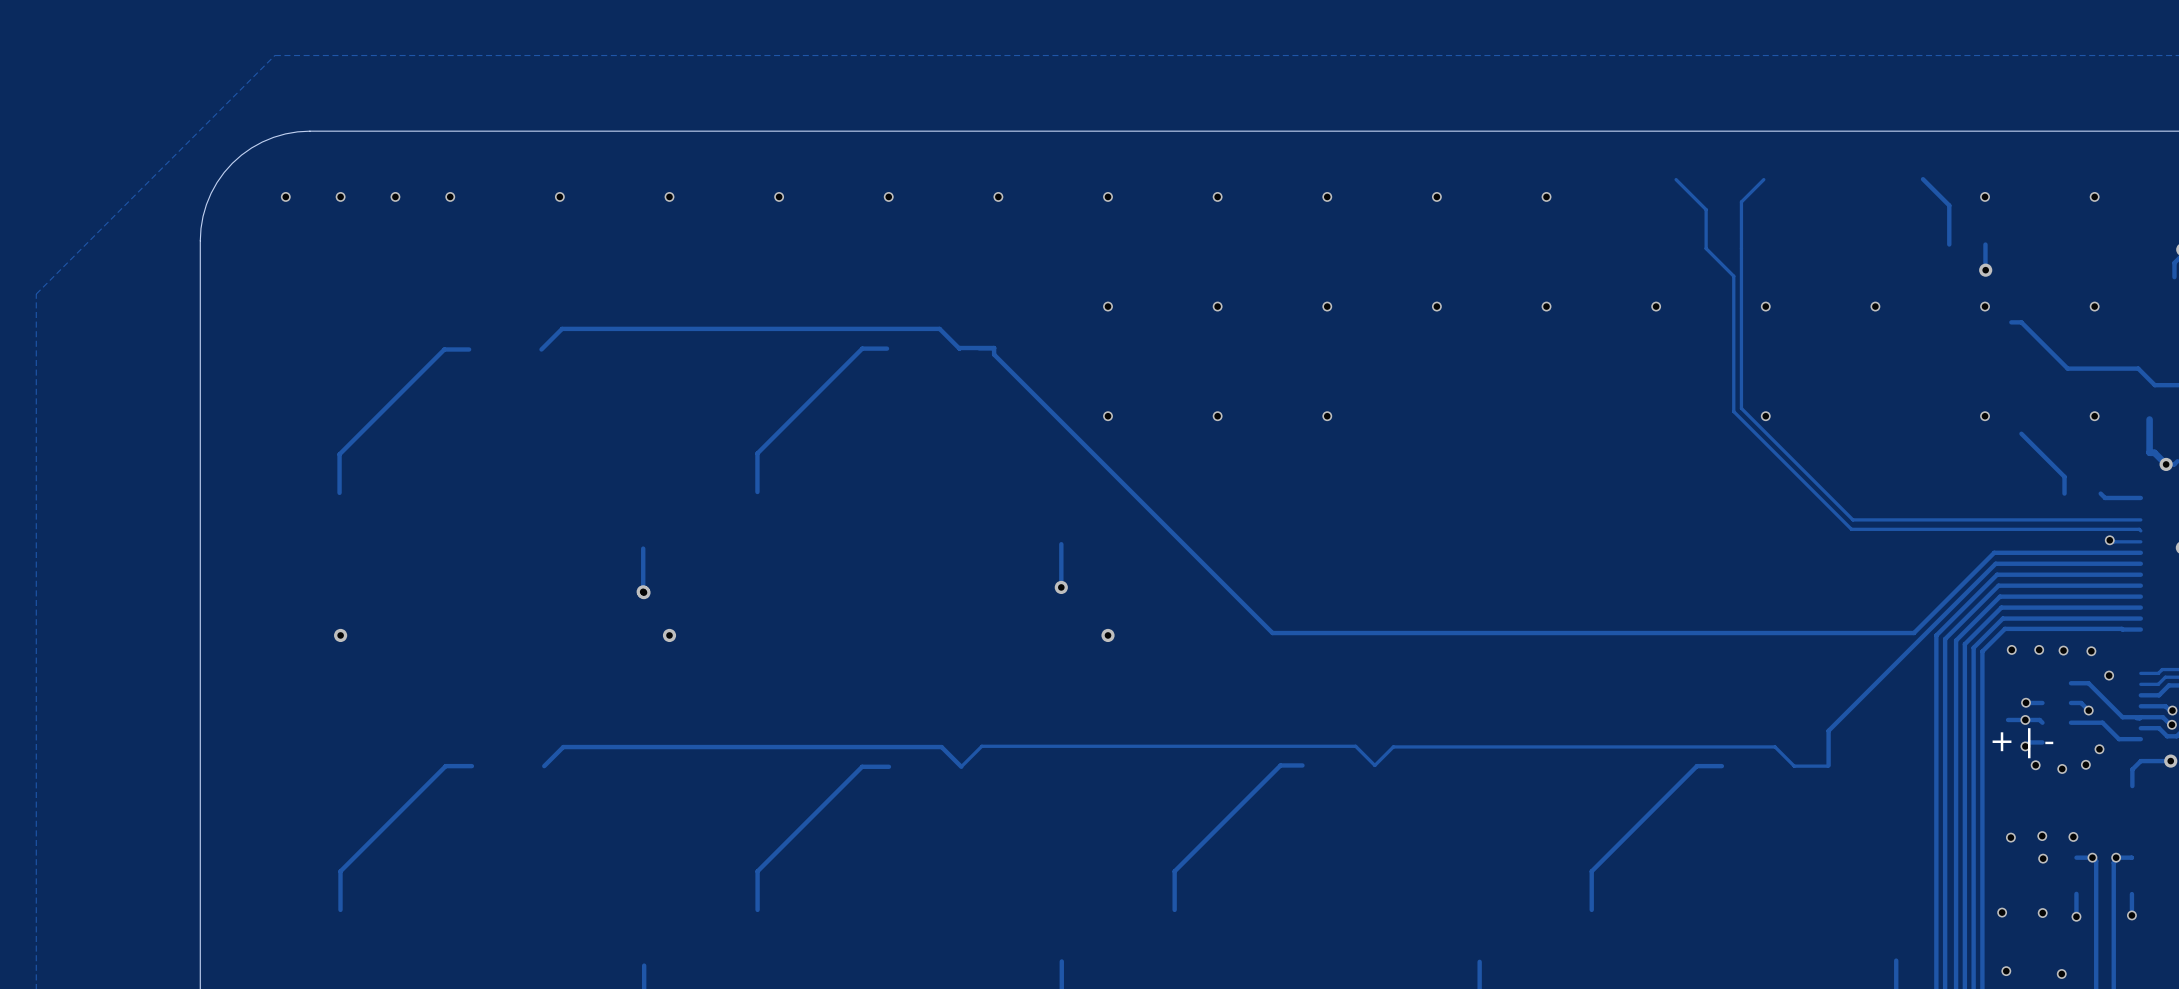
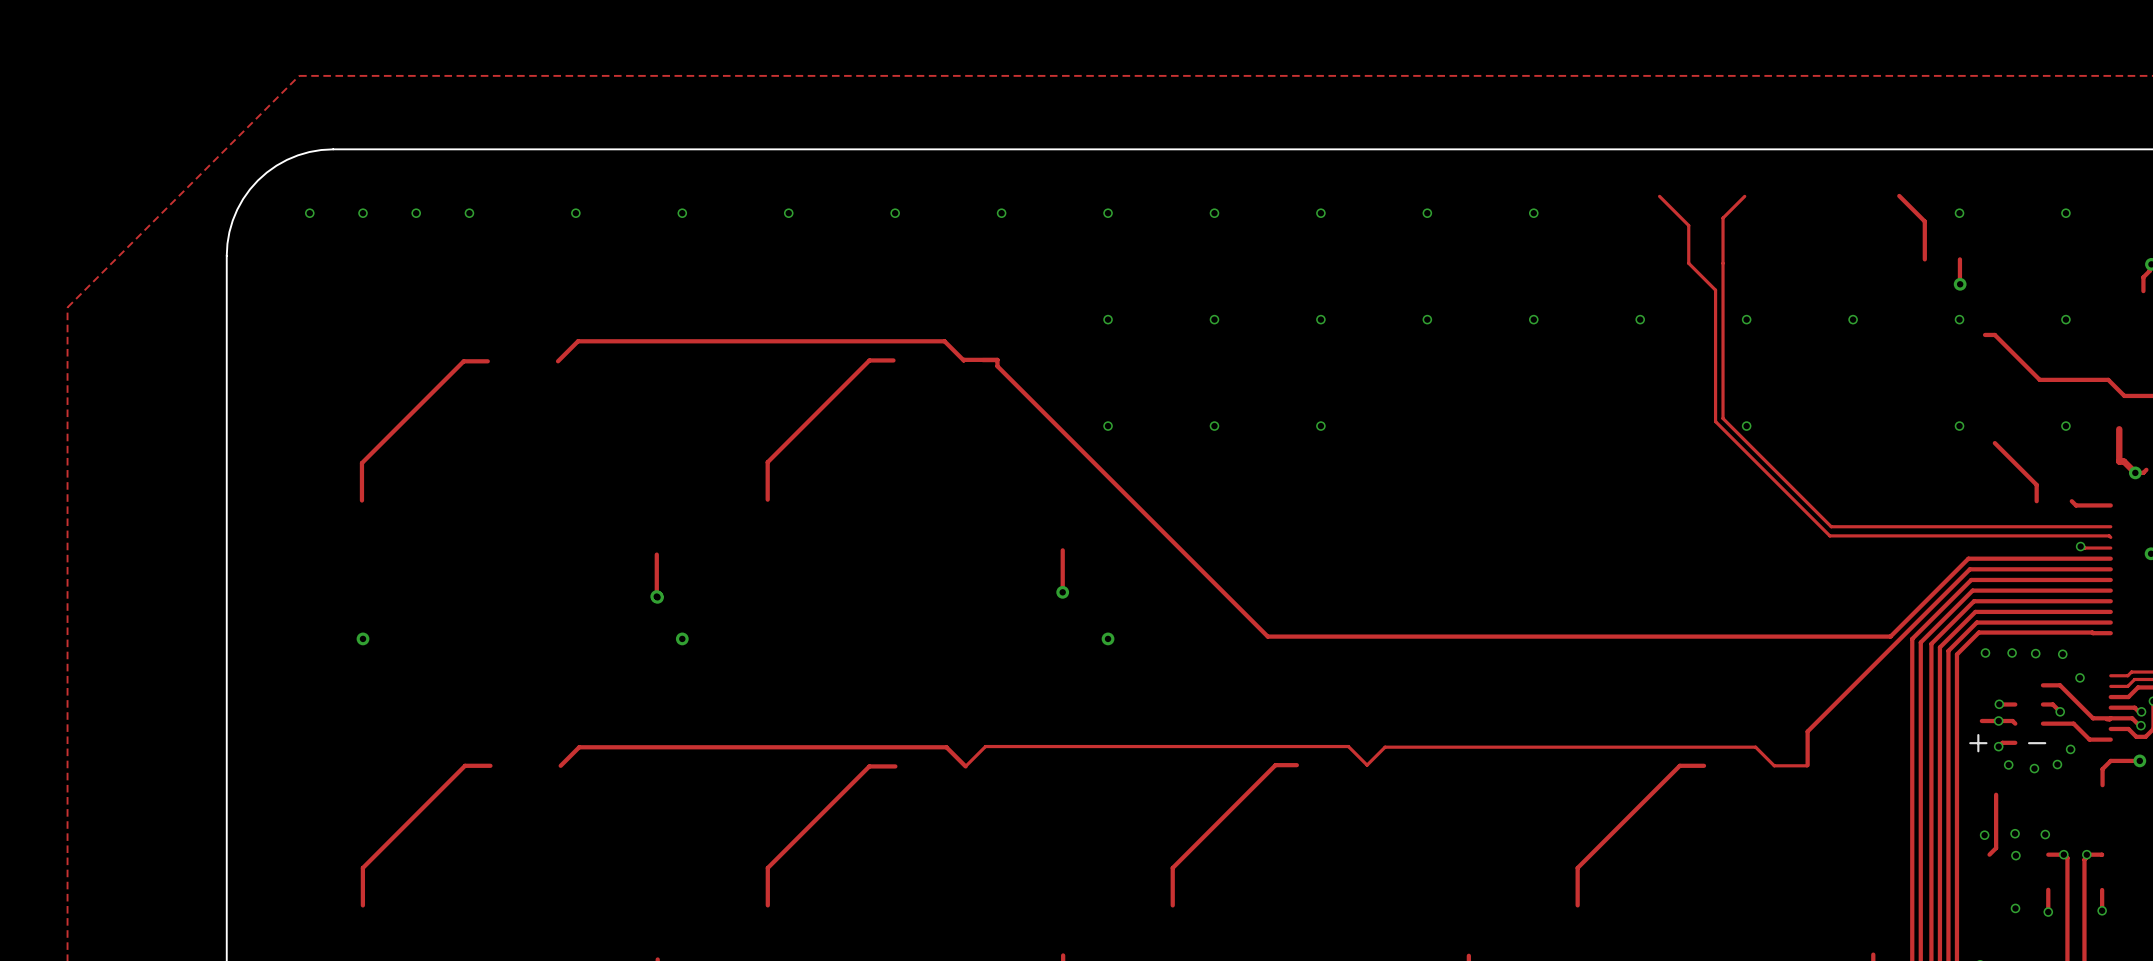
text: + | - (2022, 743) -> + - (2007, 743)
track: none -> (1996, 794) (1996, 848) (1989, 854)
via: (2002, 912) -> none

